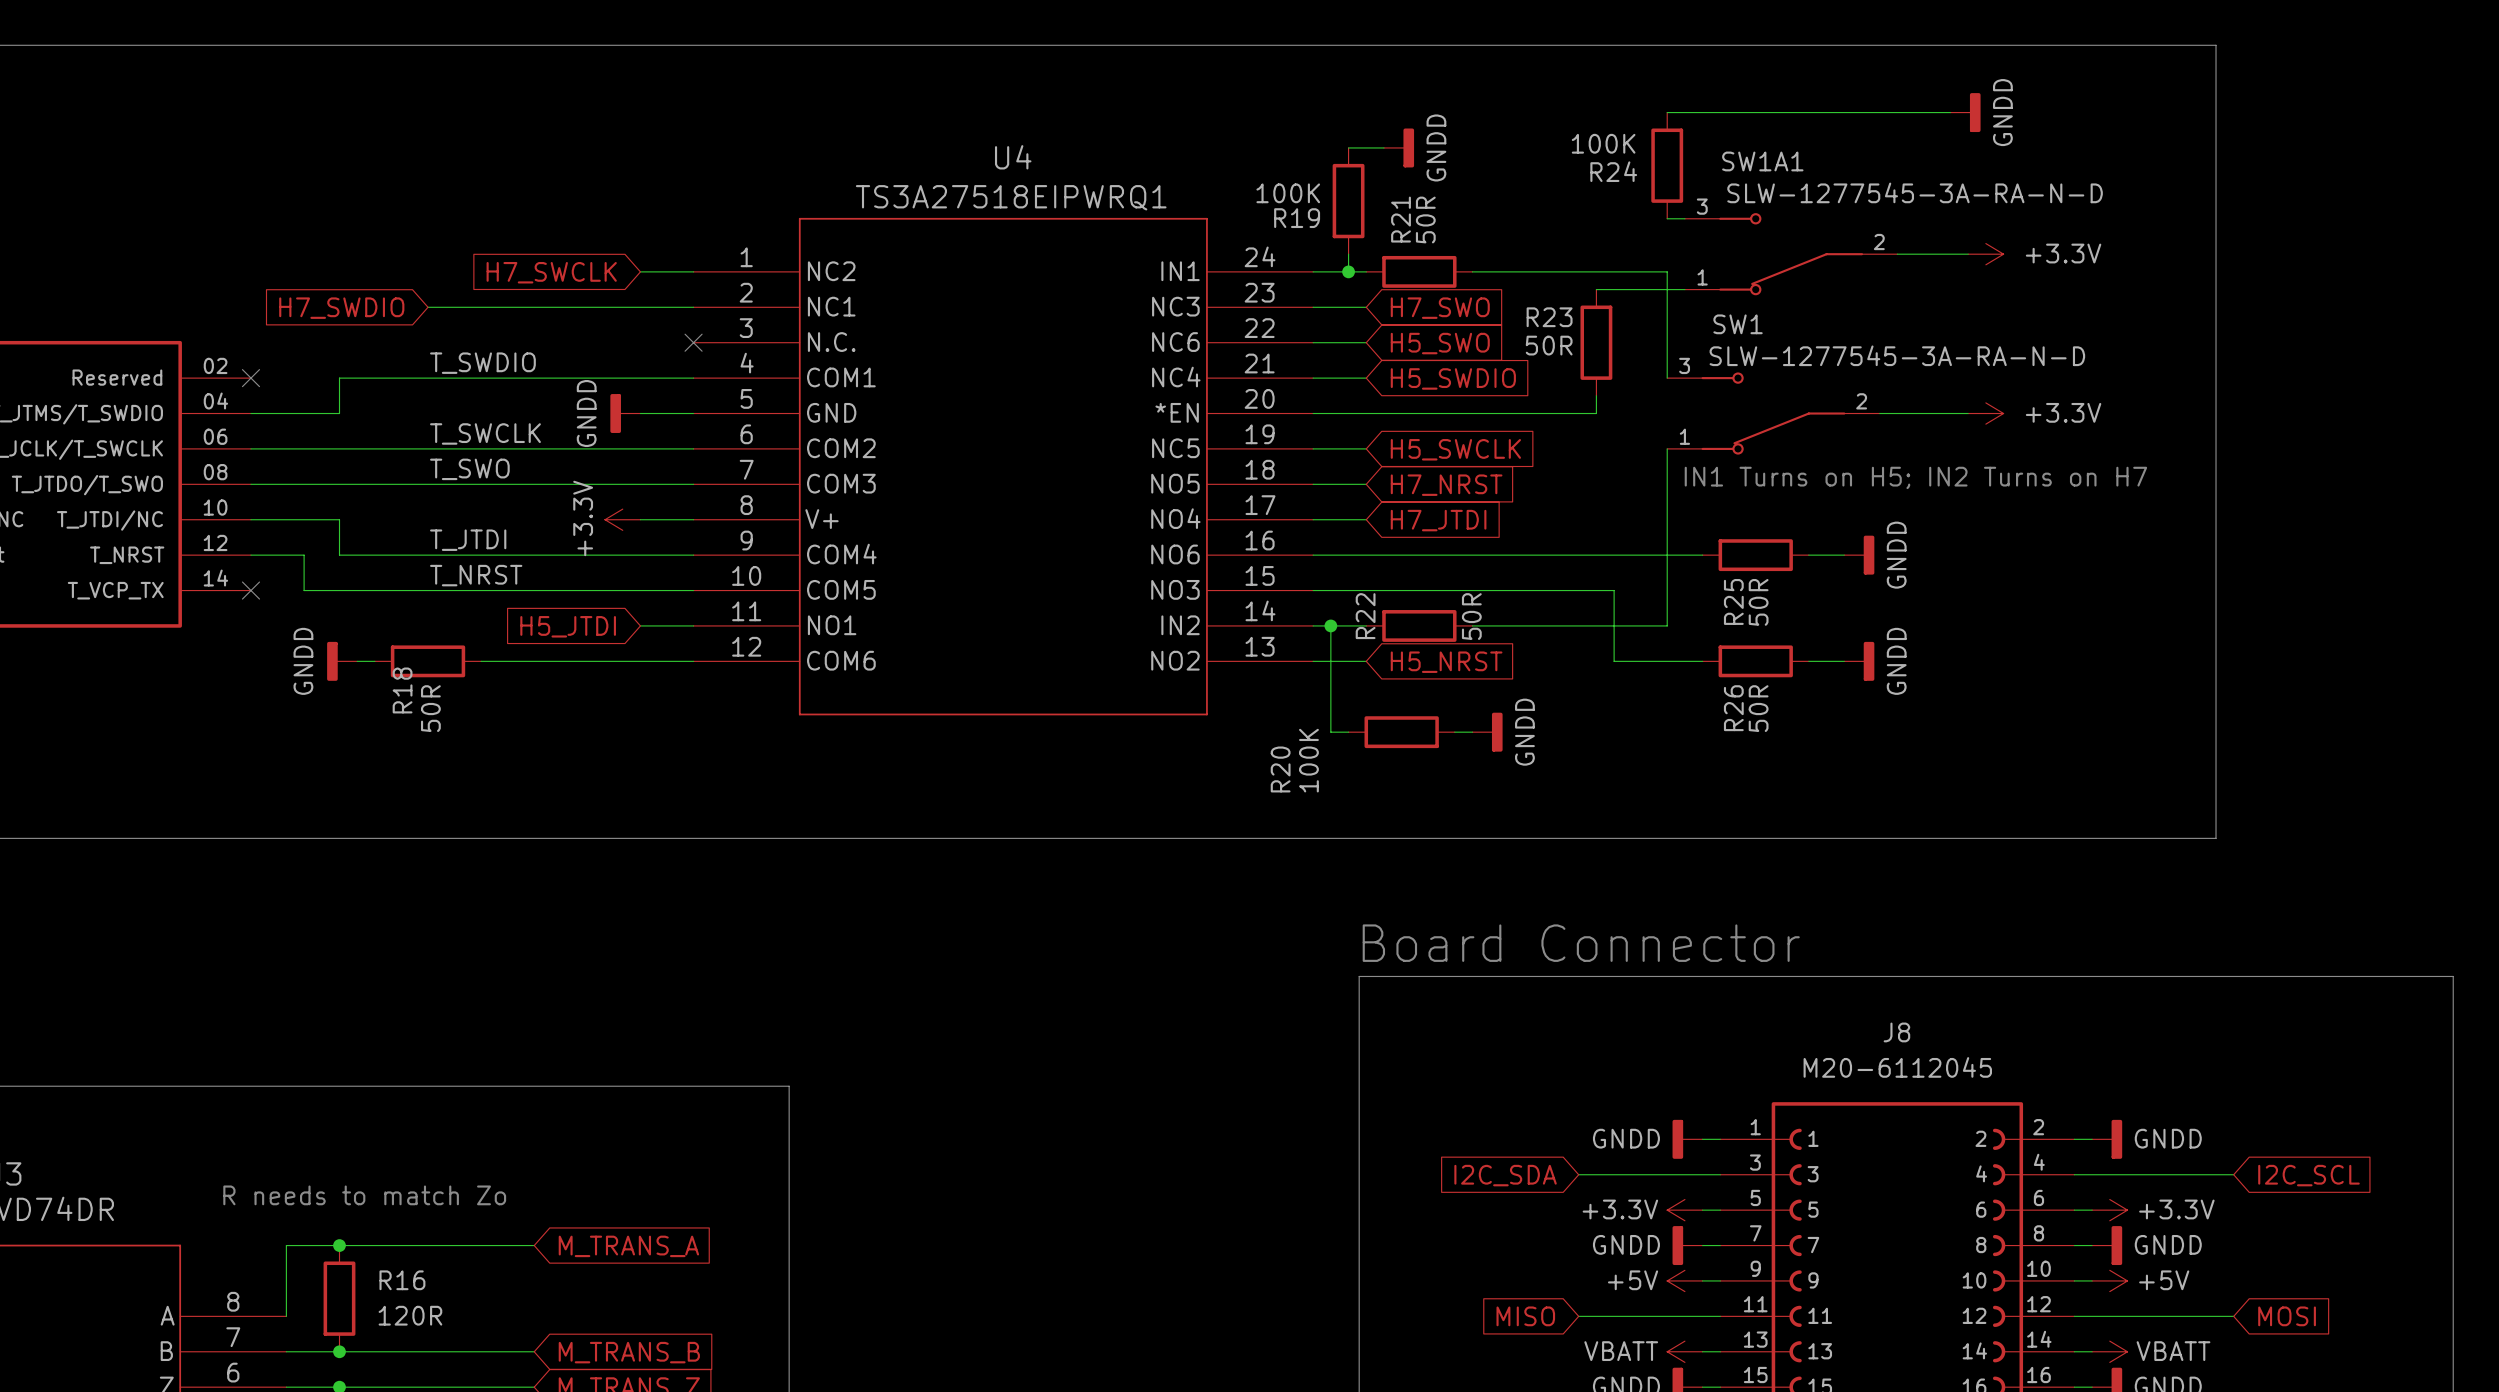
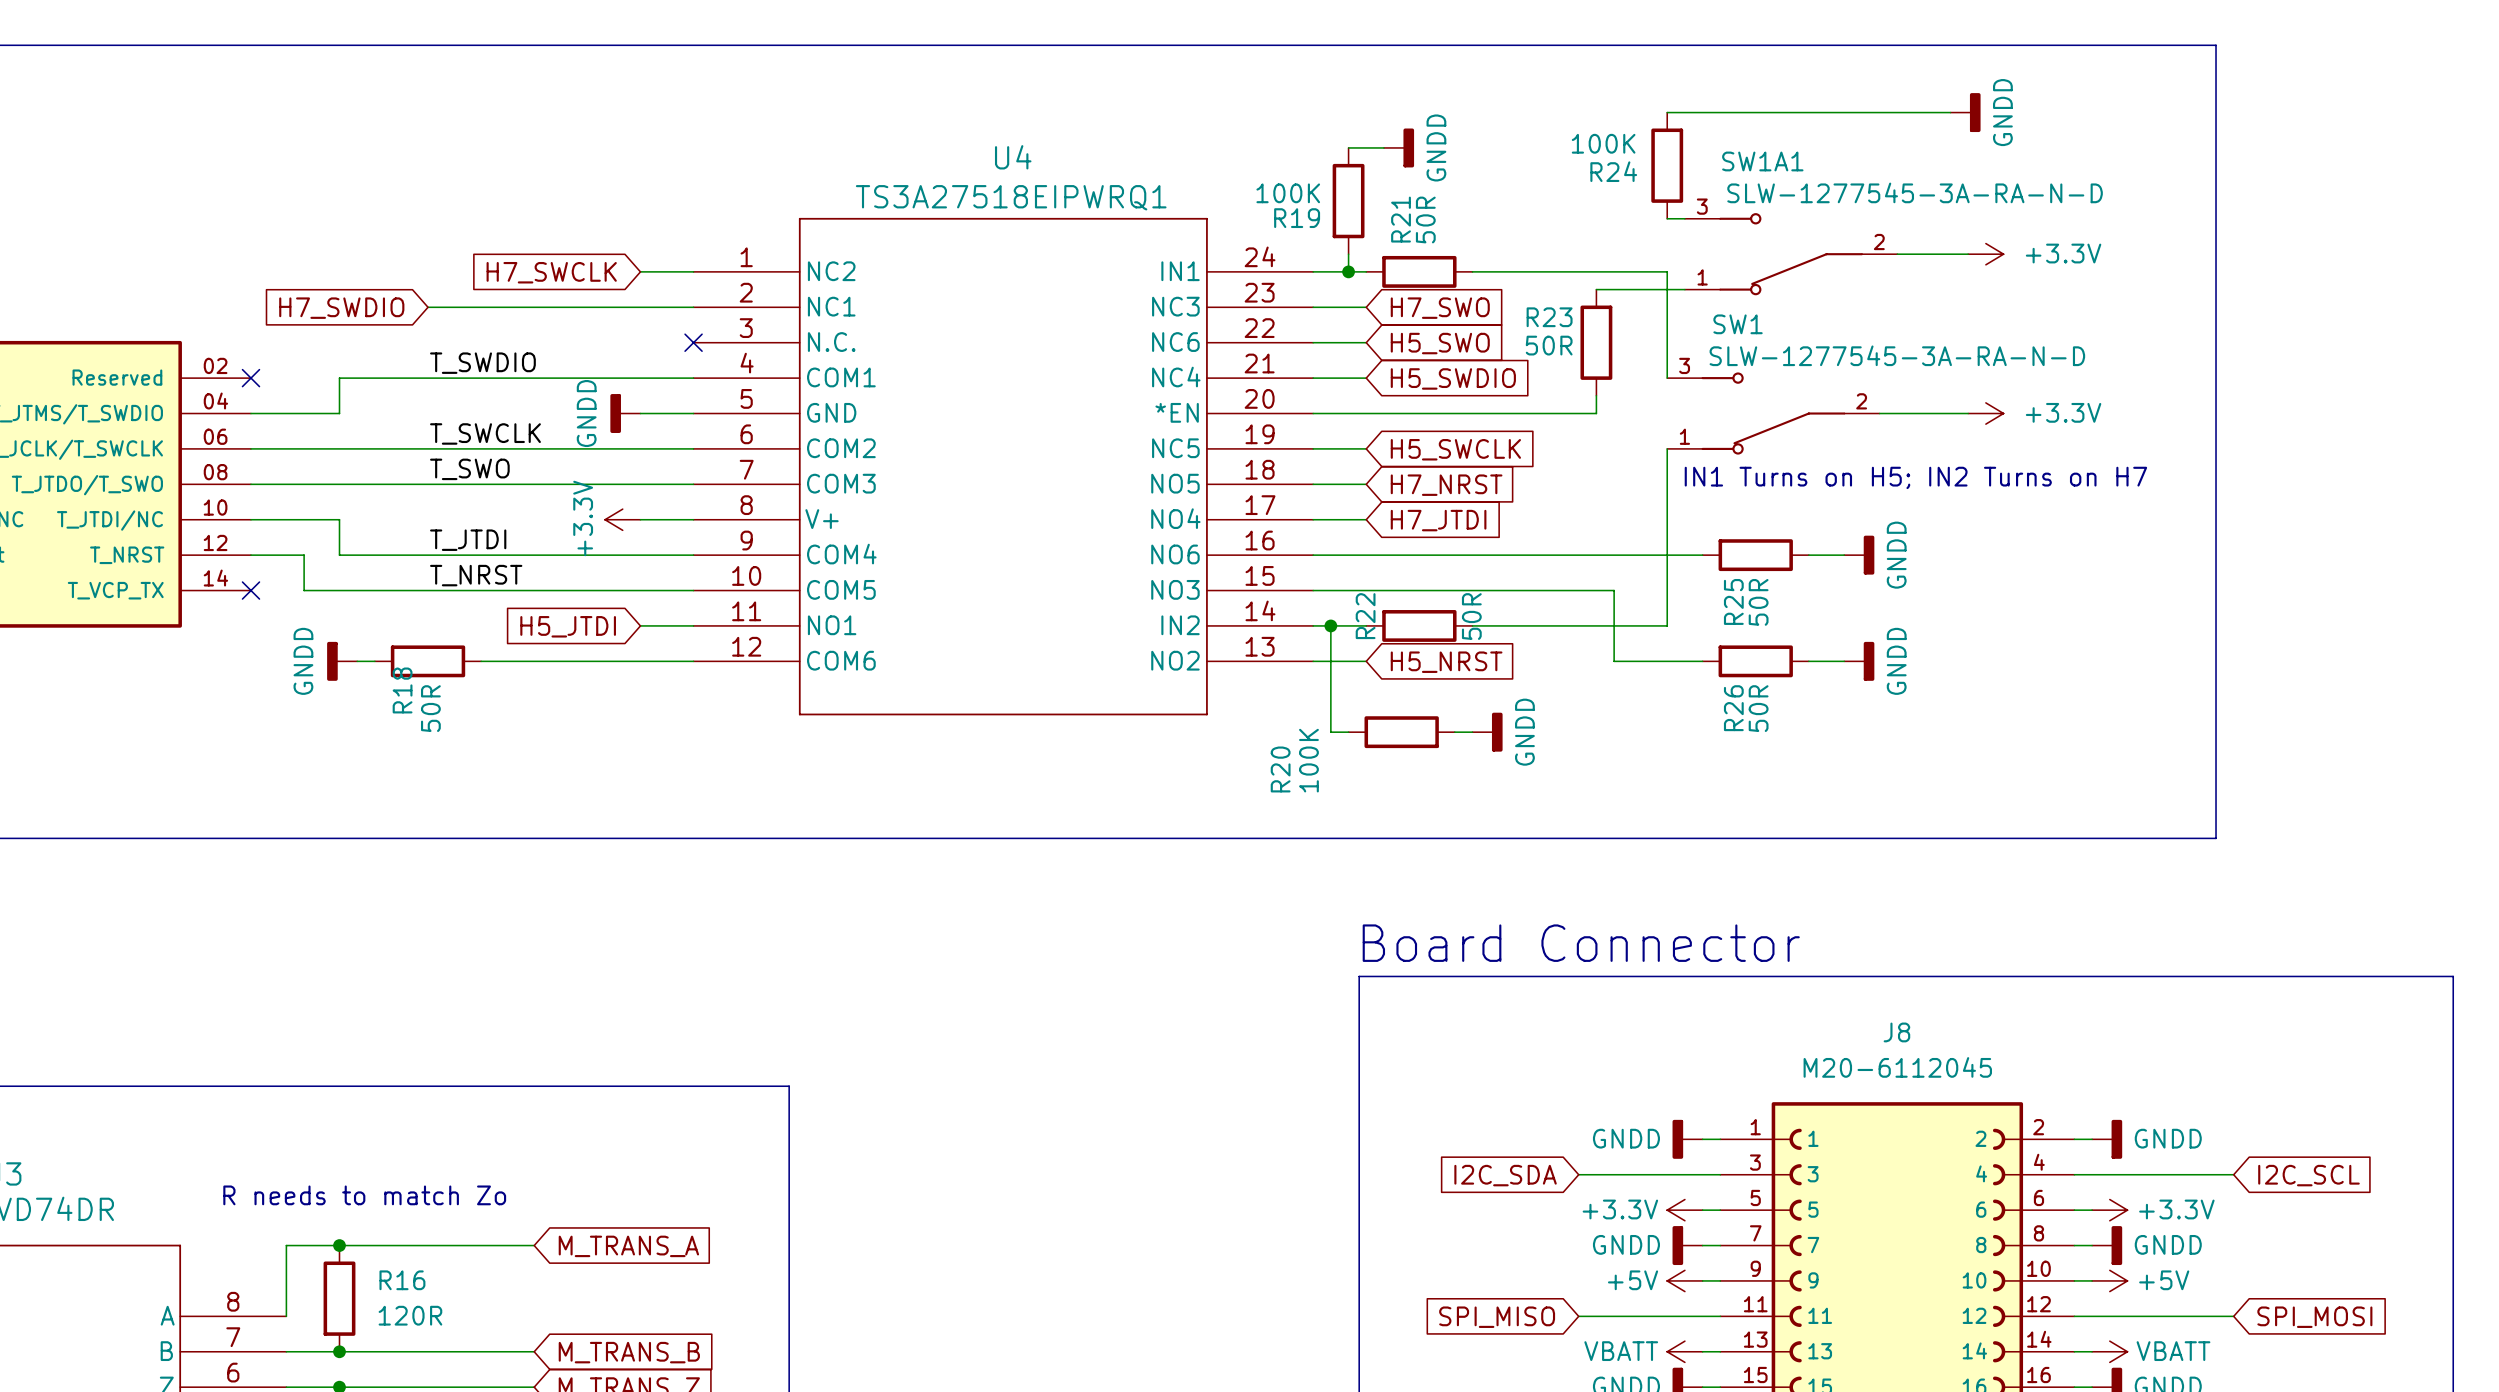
global label: MISO (1525, 1316) -> SPI_MISO (1497, 1317)
global label: MOSI (2287, 1316) -> SPI_MOSI (2314, 1317)

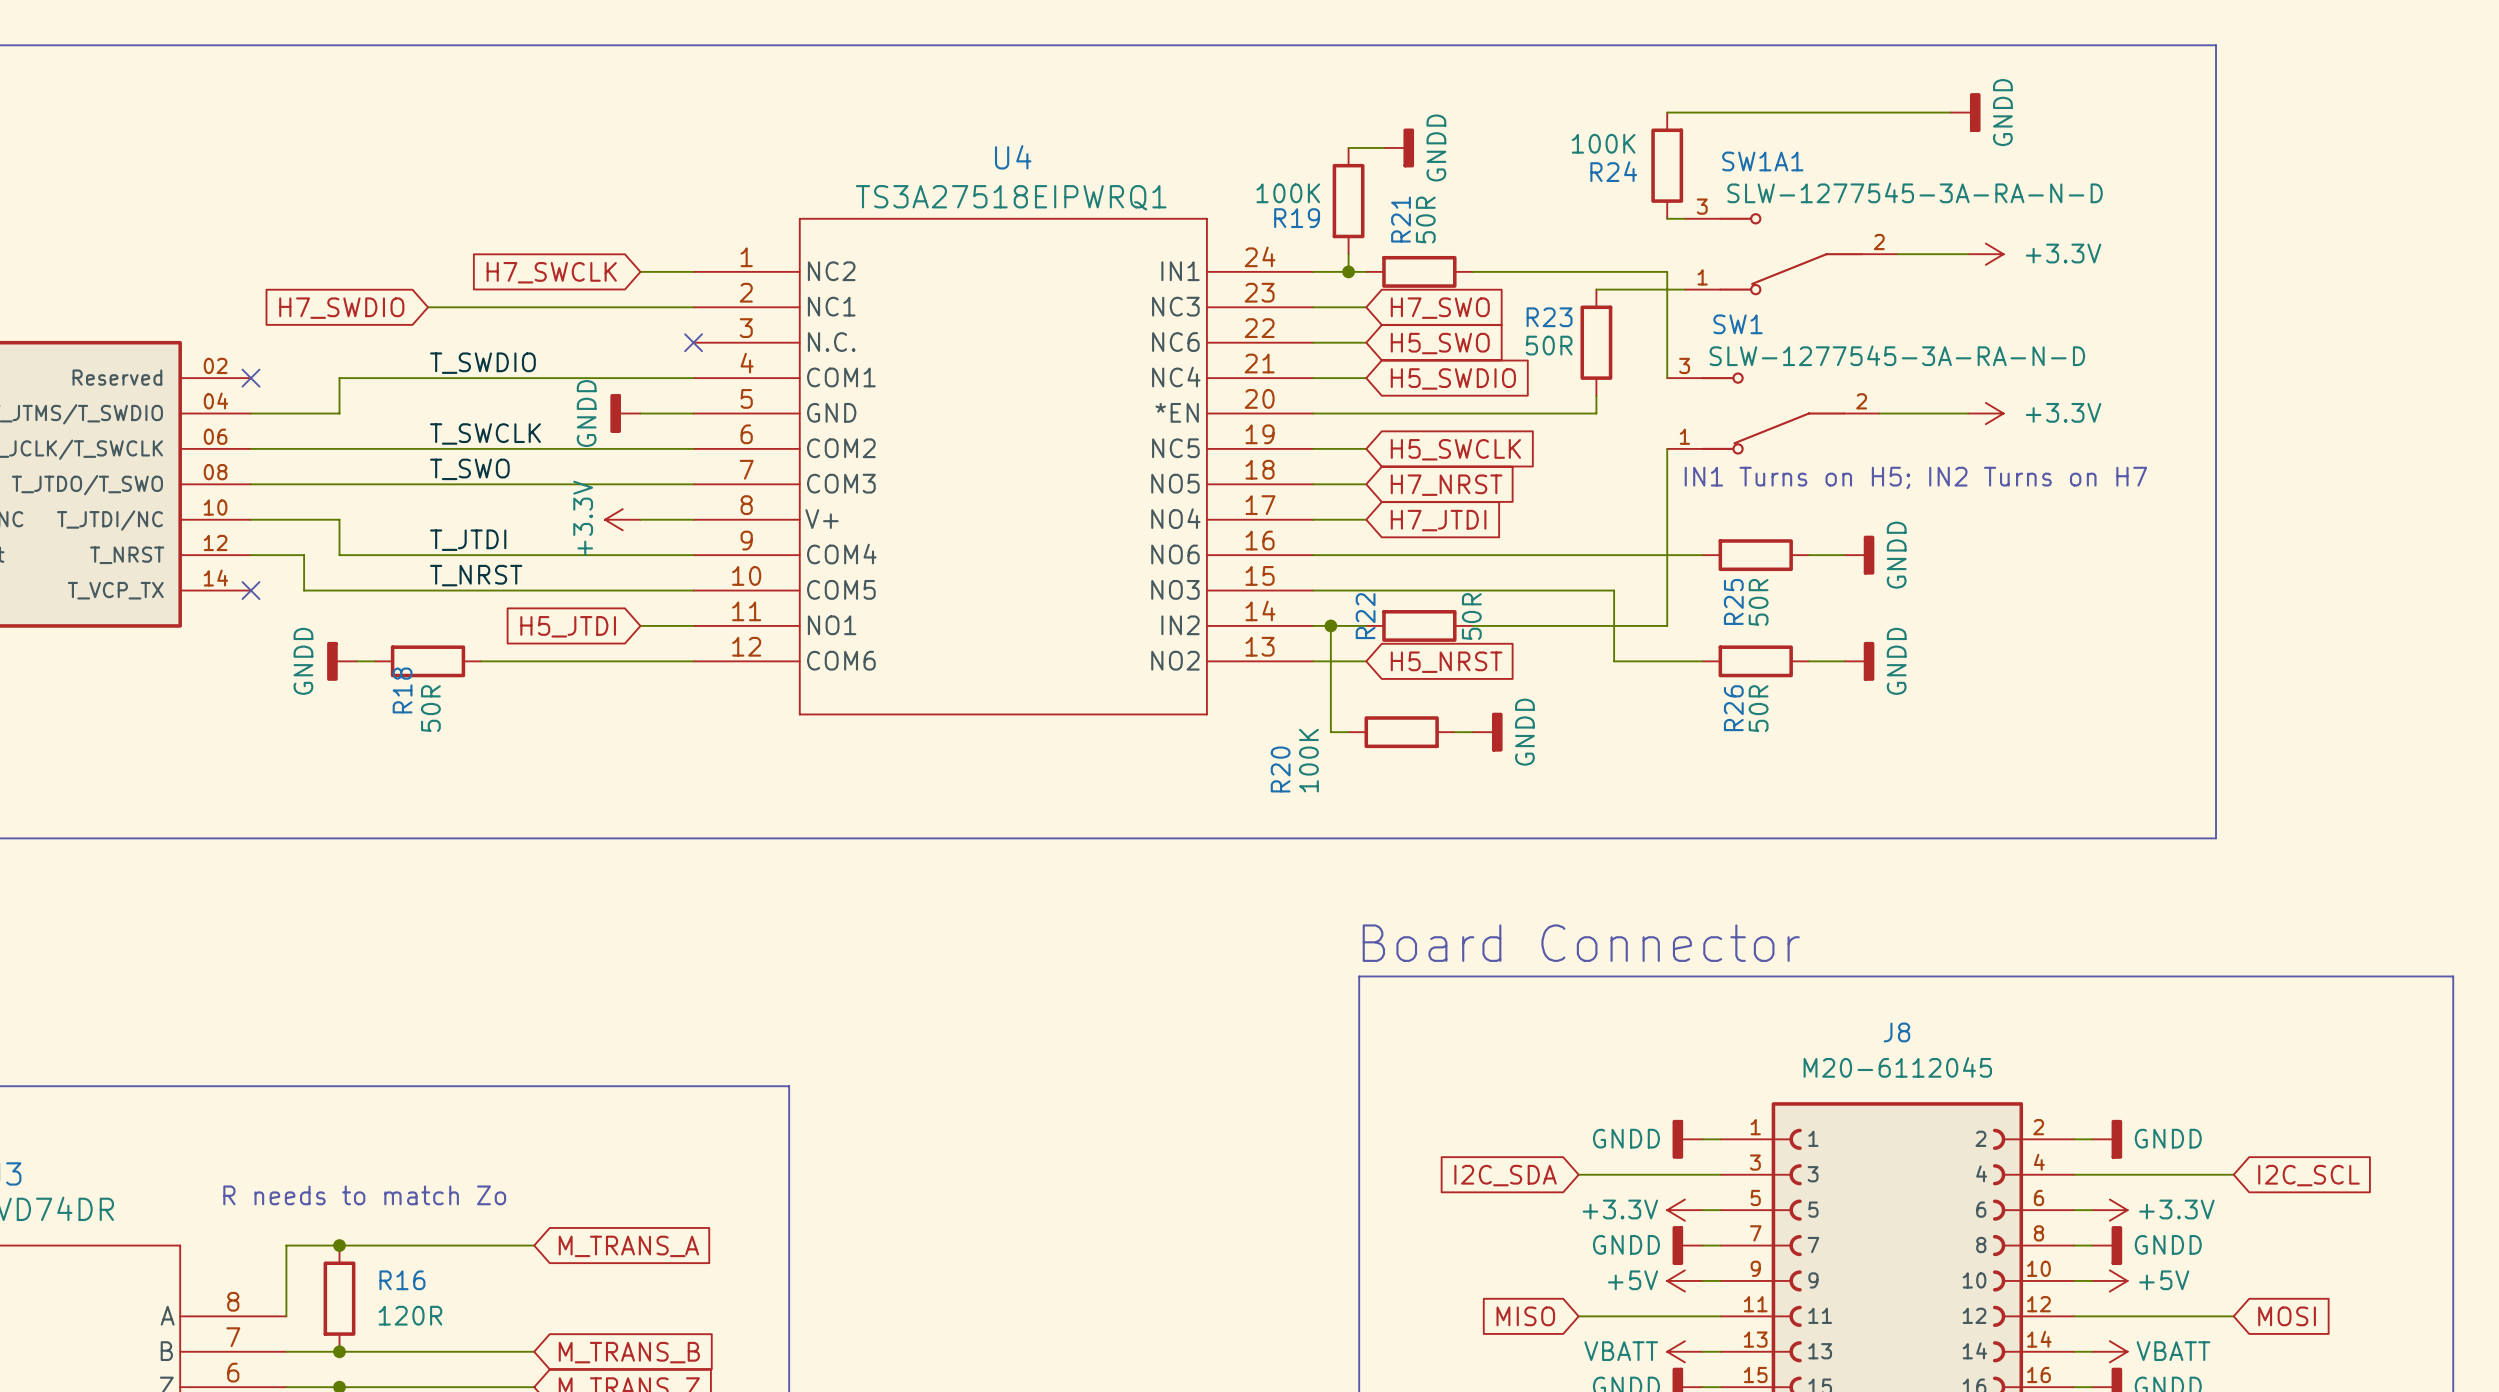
global label: SPI_MISO (1497, 1317) -> MISO (1525, 1316)
global label: SPI_MOSI (2314, 1317) -> MOSI (2287, 1316)

